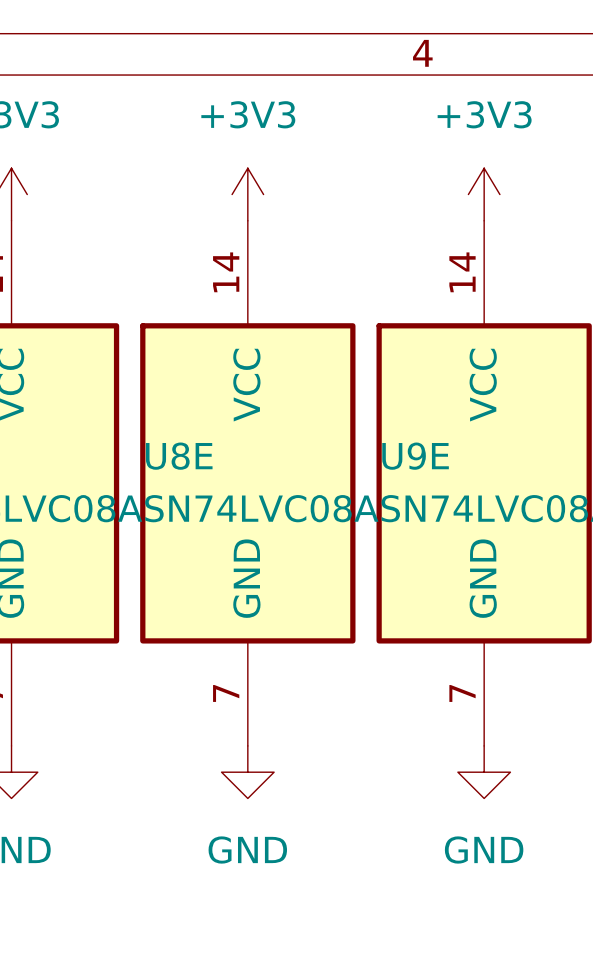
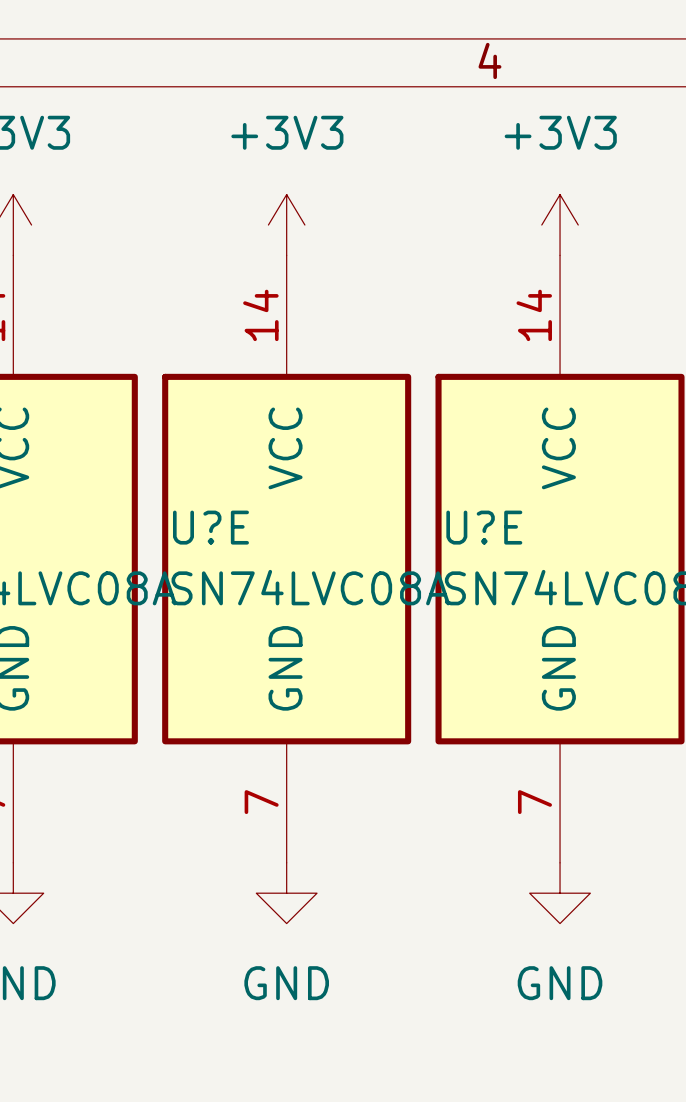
U8E name: U8E (179, 456) -> U?E (210, 527)
U9E name: U9E (415, 456) -> U?E (484, 527)

